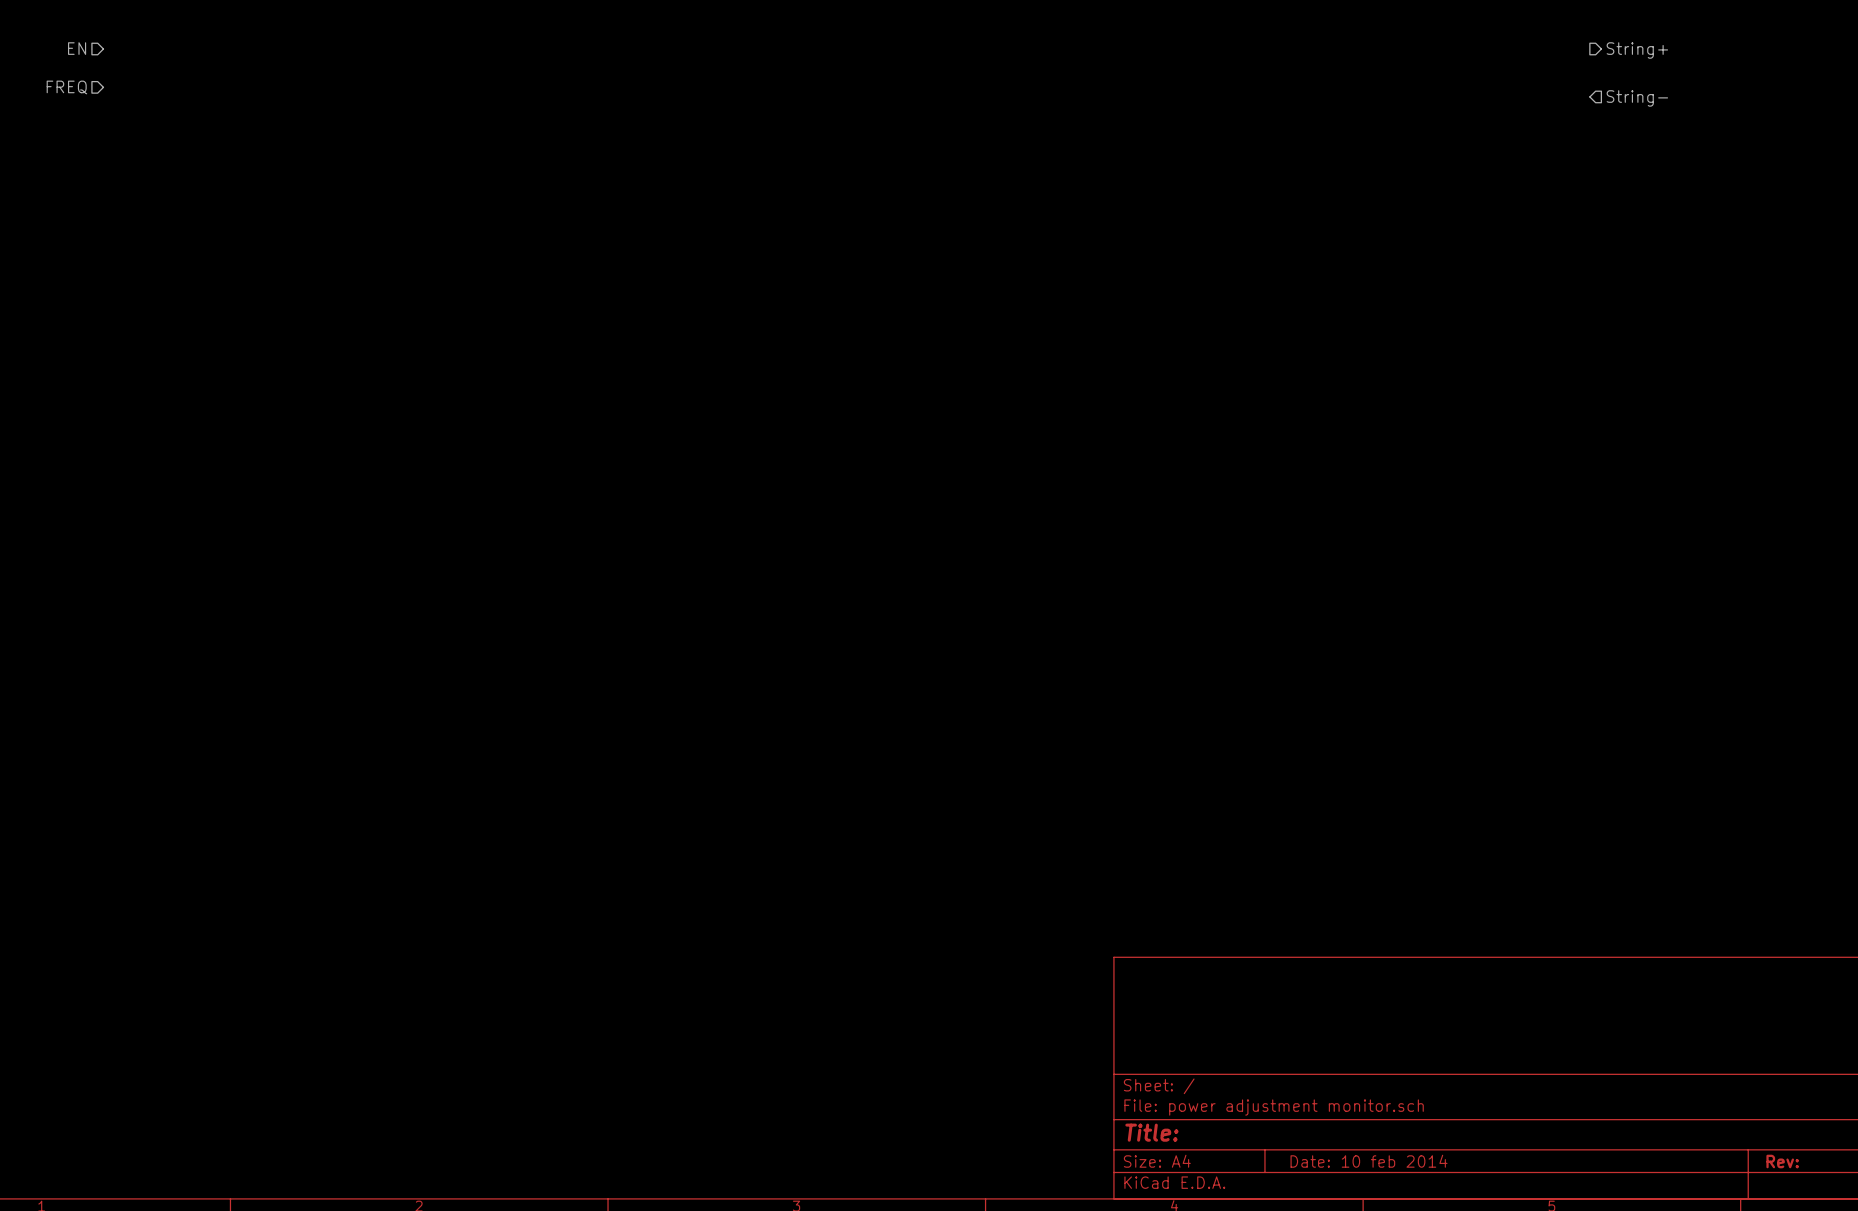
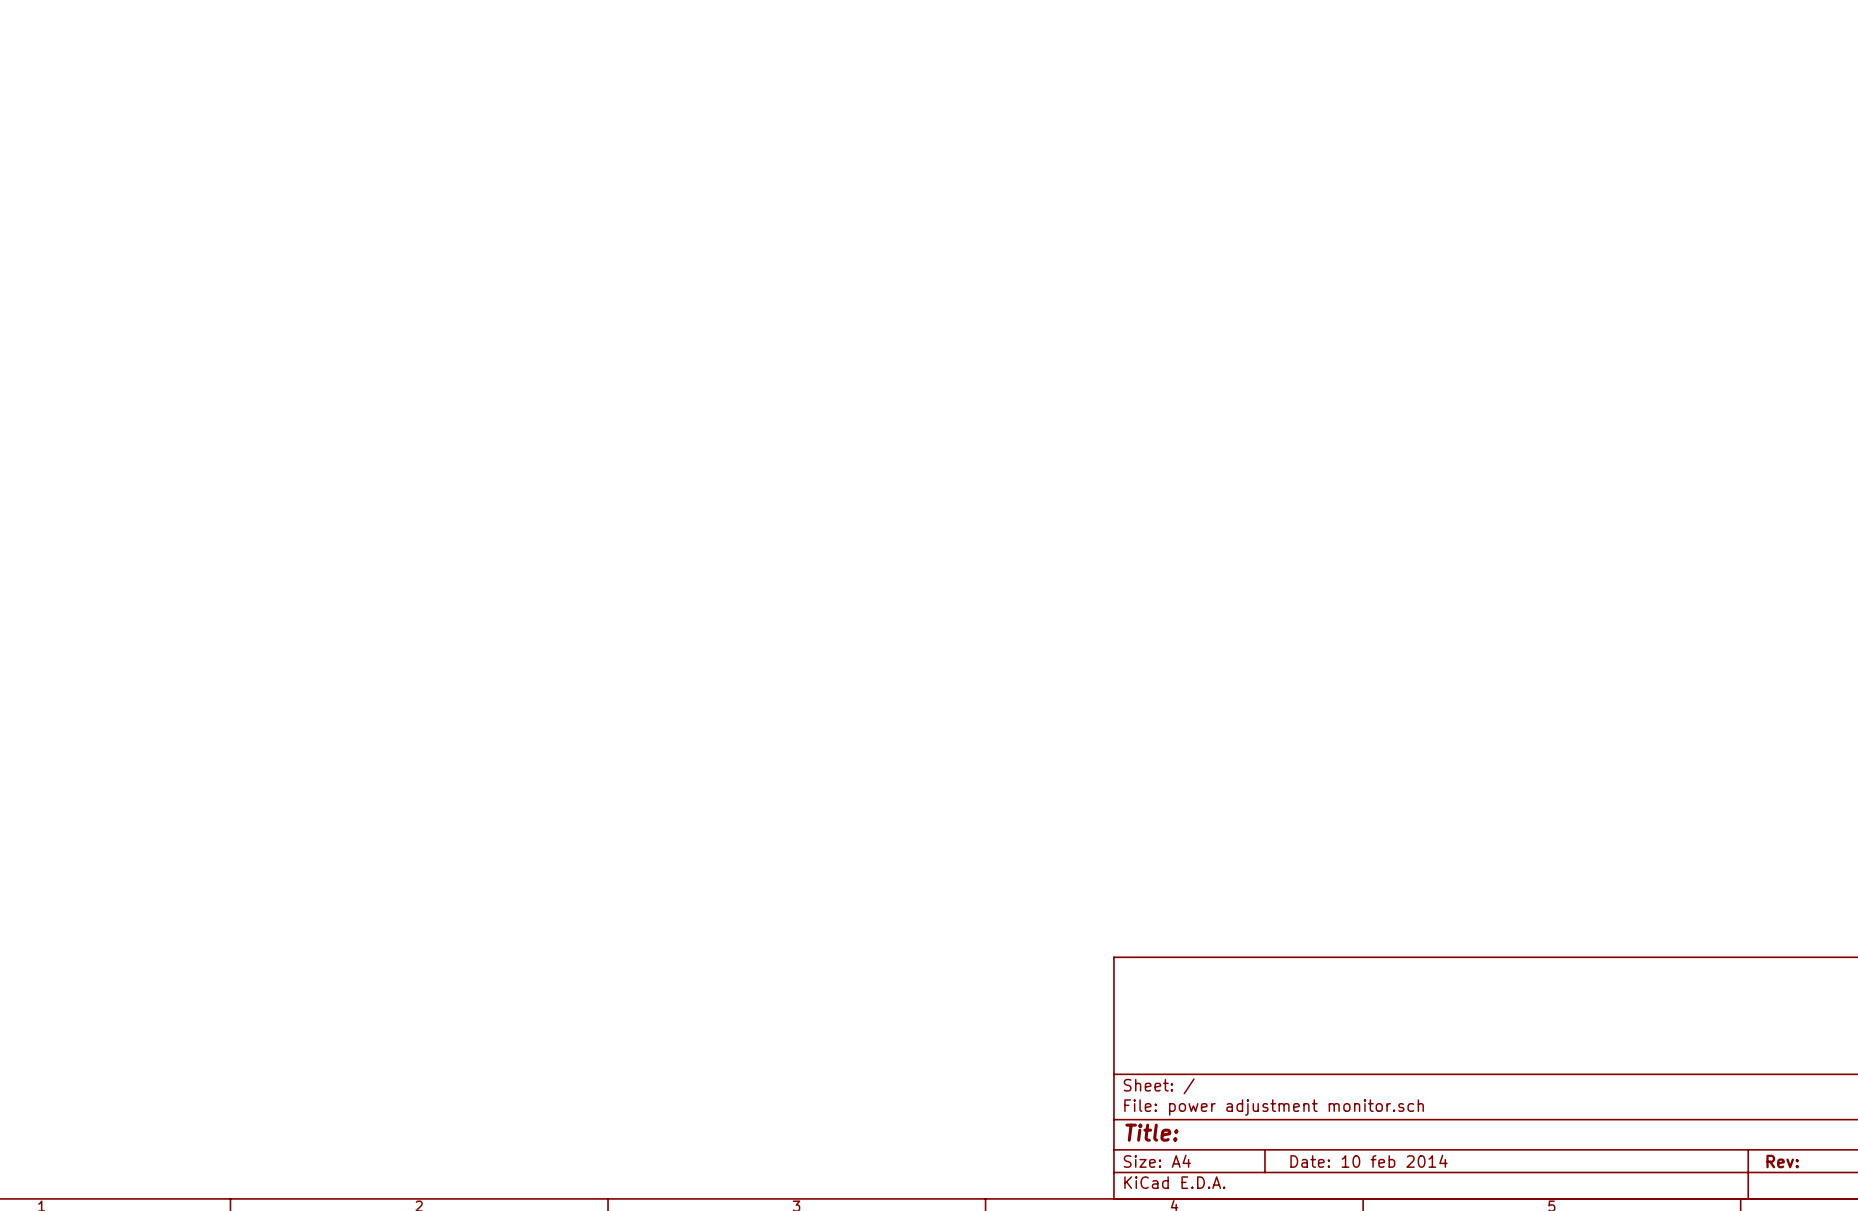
hierarchical label: EN (77, 48) -> none
hierarchical label: String+ (1637, 50) -> none
hierarchical label: FREQ (66, 87) -> none
hierarchical label: String- (1637, 98) -> none

